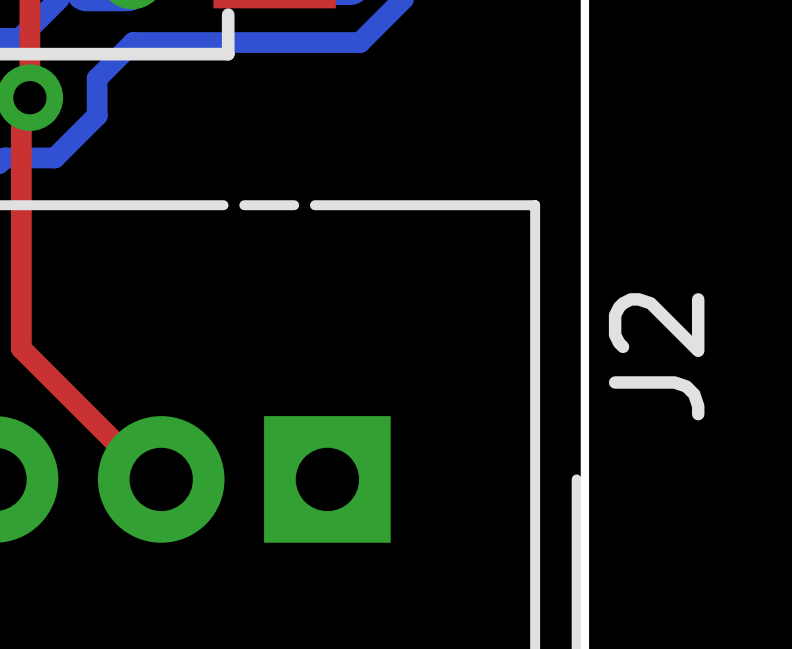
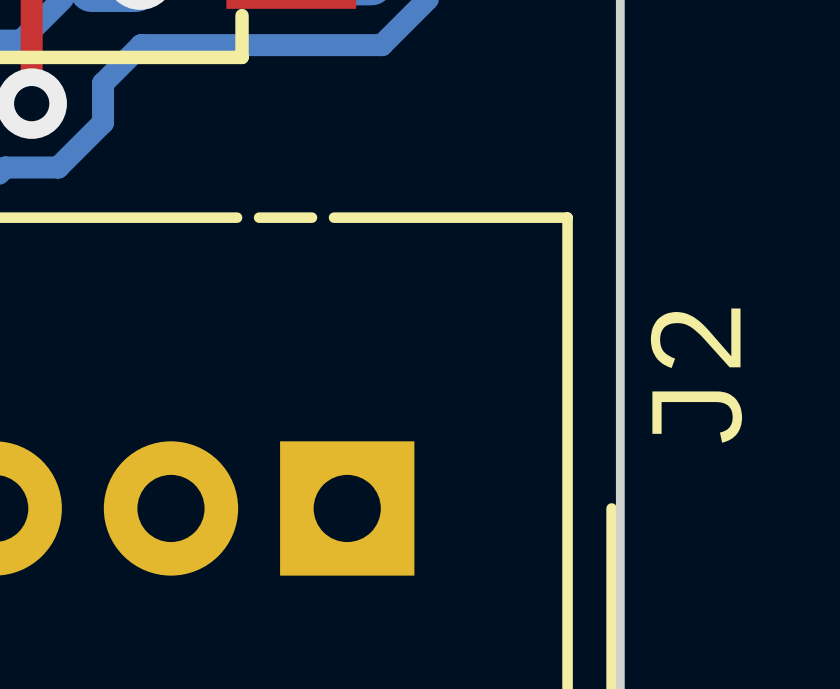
top track: (29, 97) (21, 106) (21, 348) (152, 479) (161, 479) -> none

